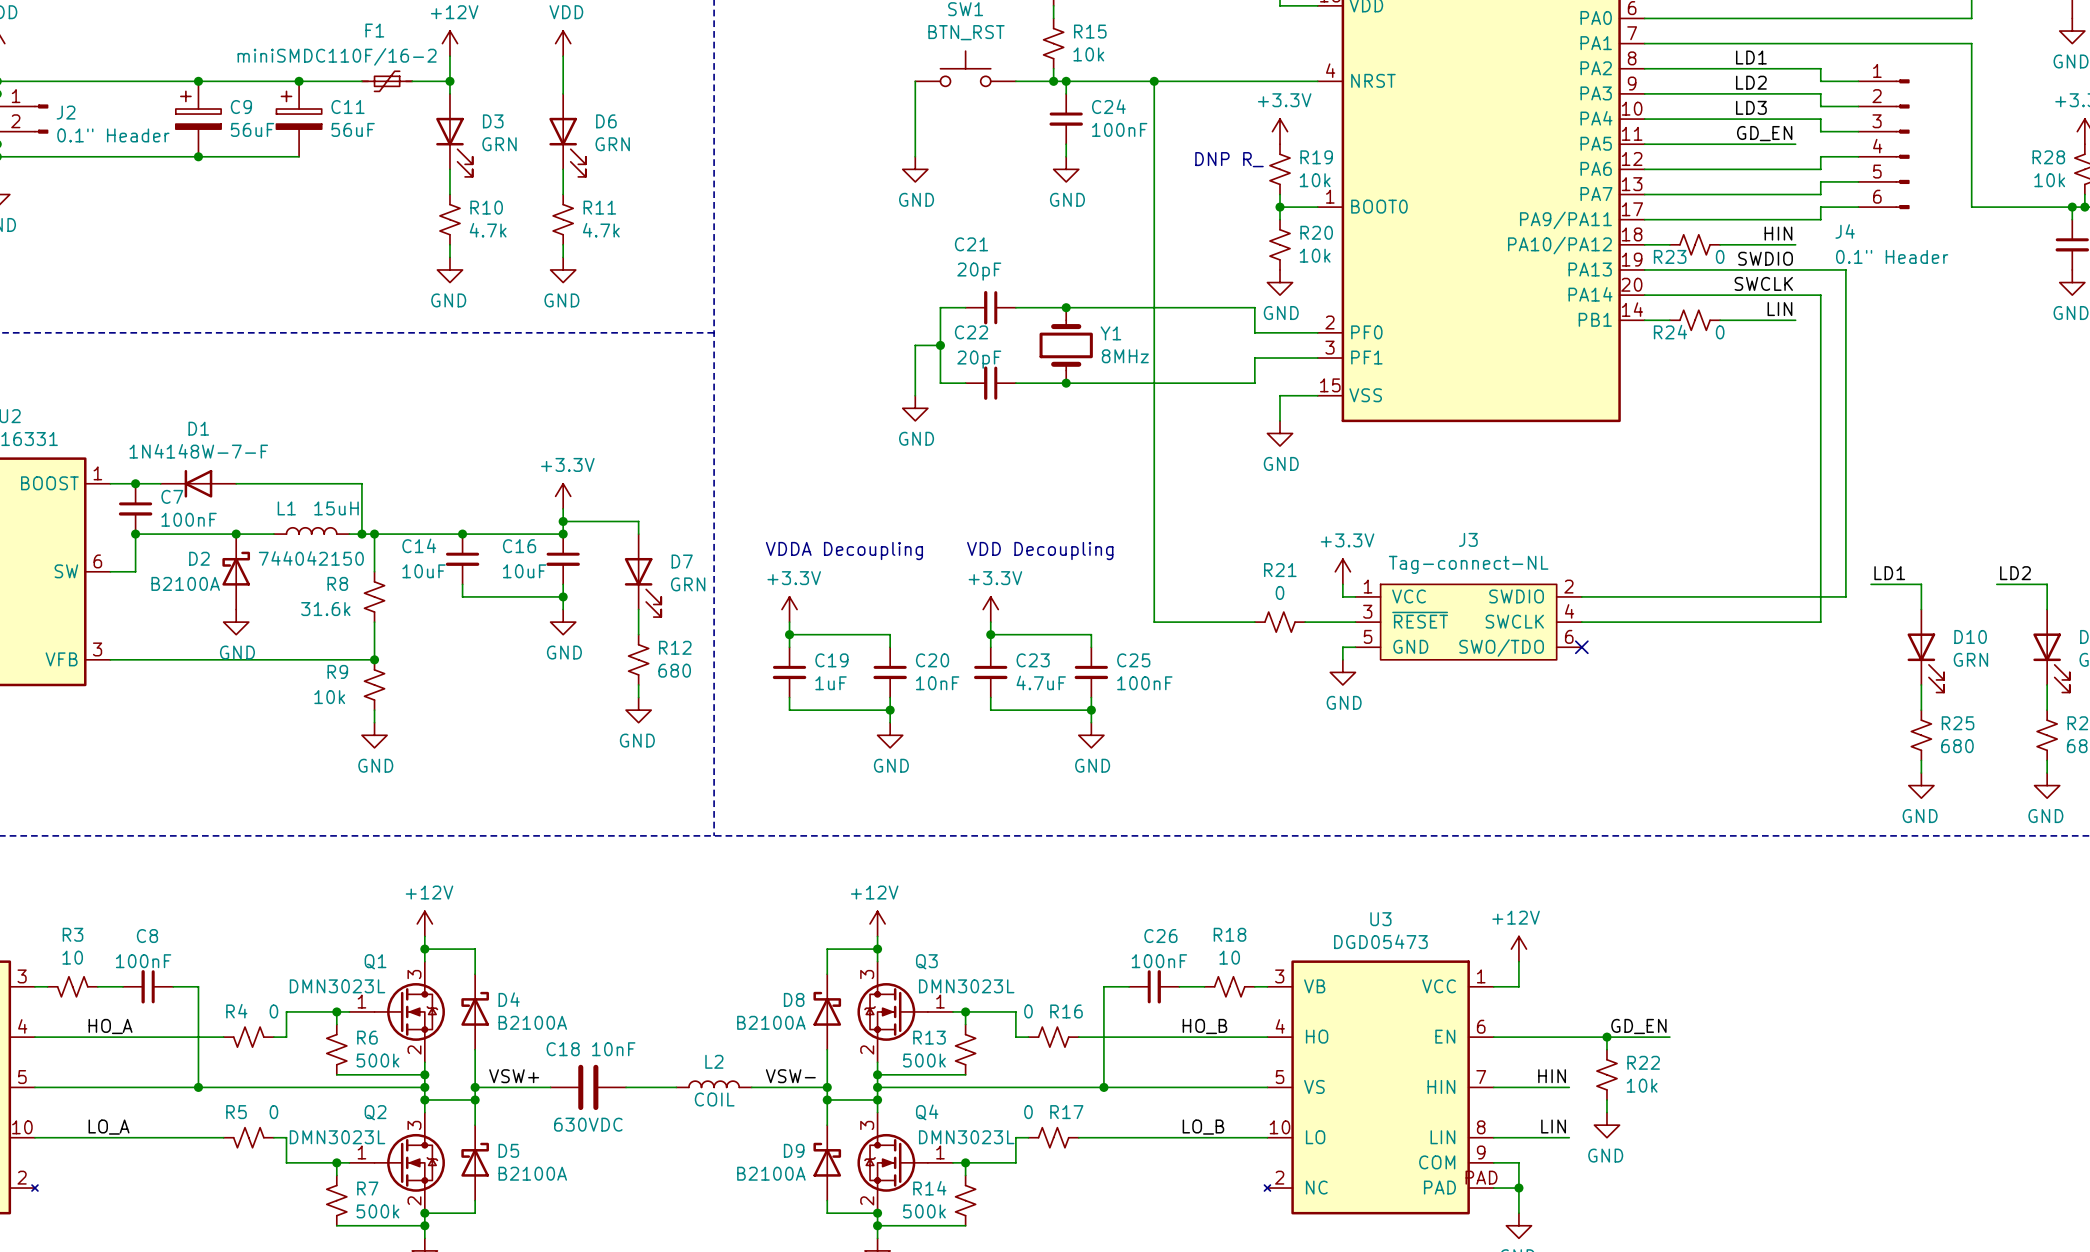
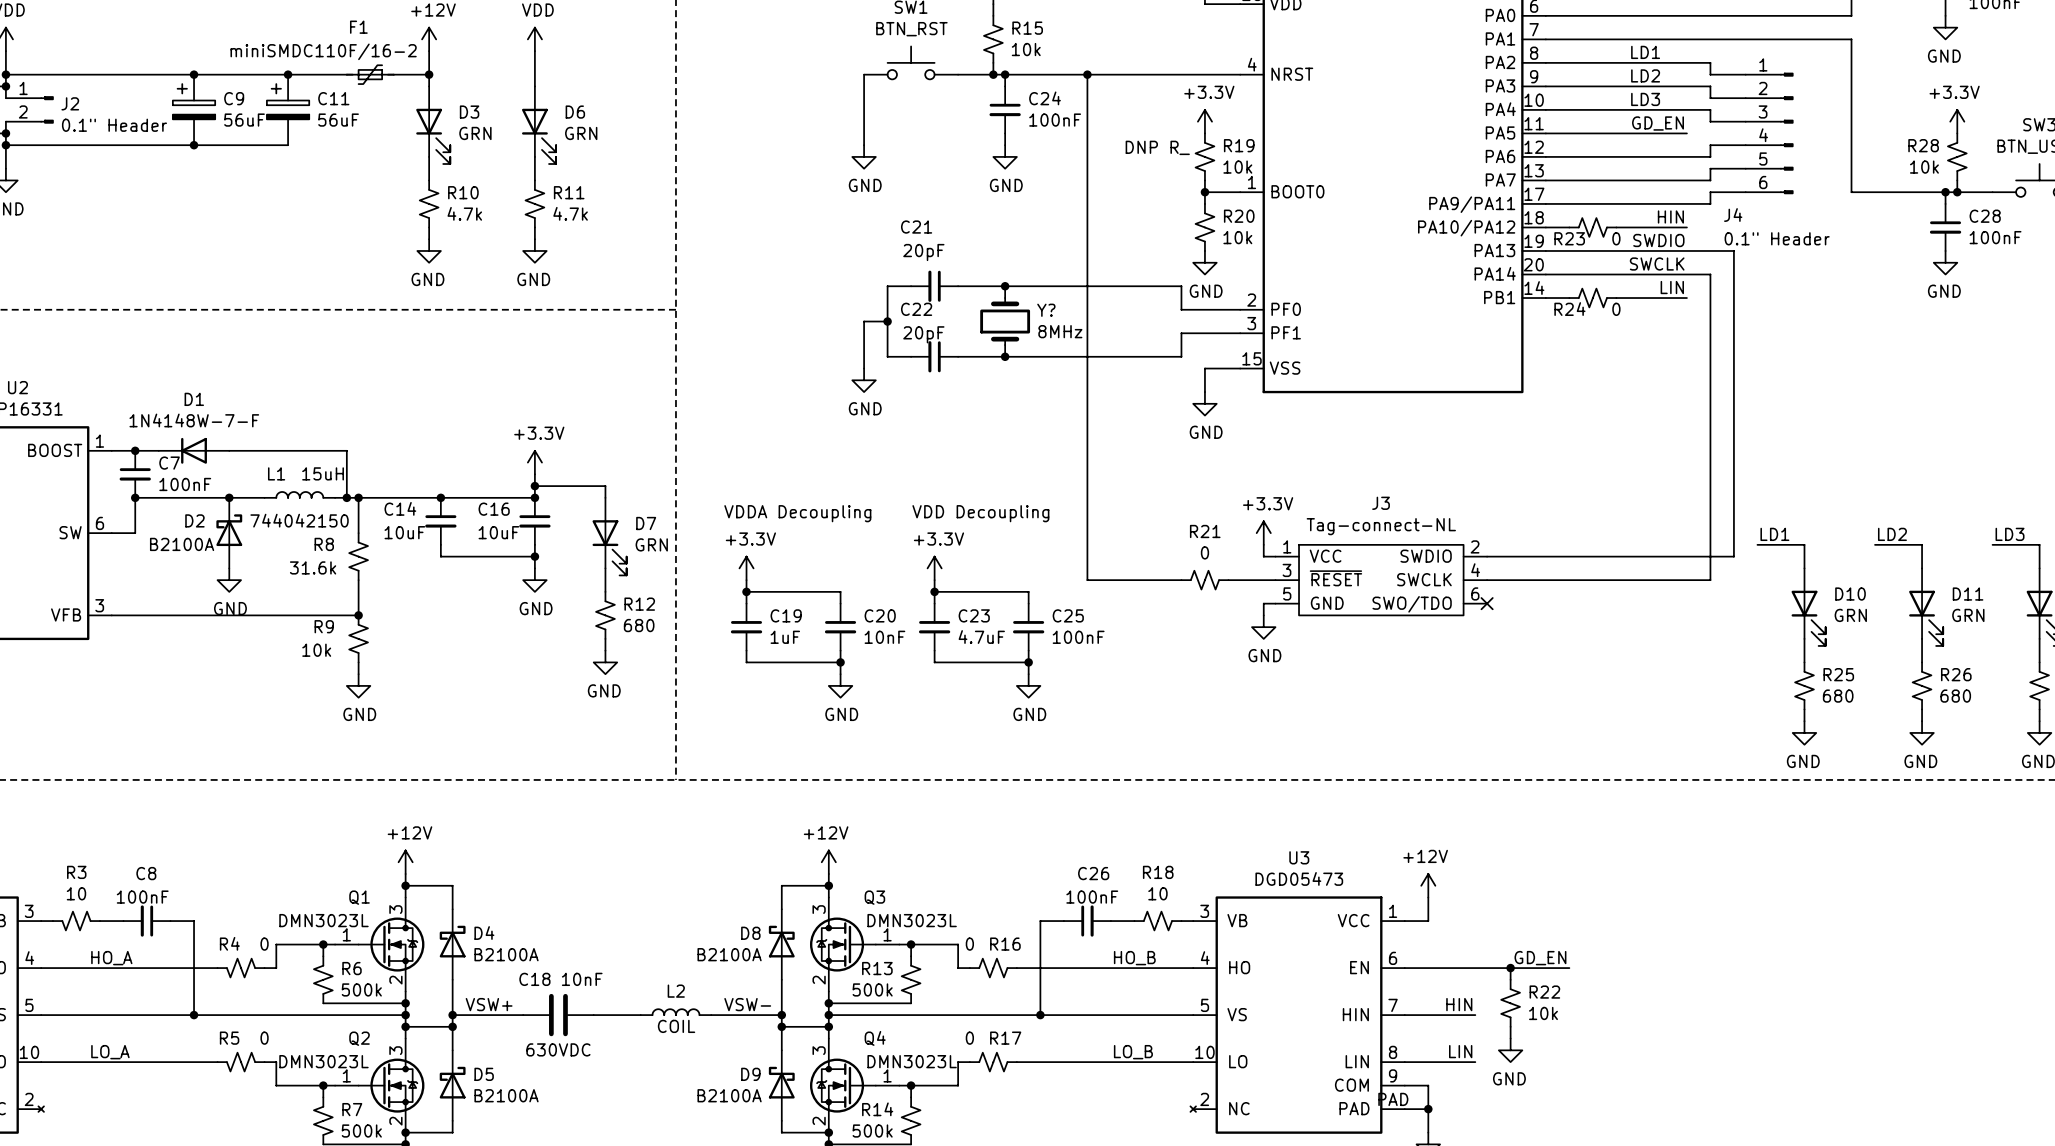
Y1 name: Y1 (1110, 333) -> Y? (1046, 310)

